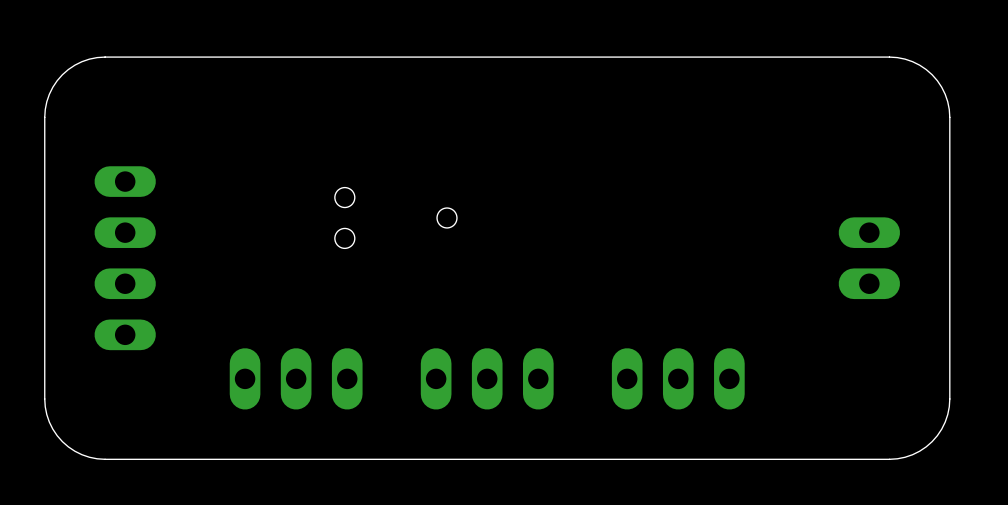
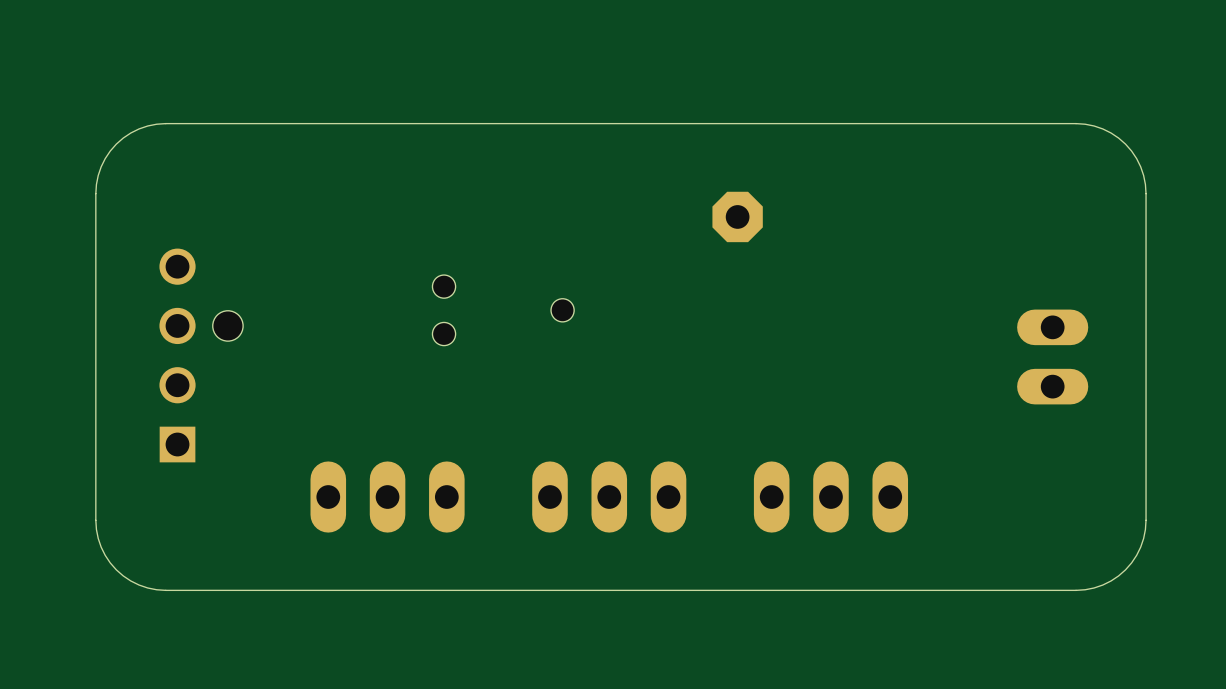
part: none -> (737, 216)
part footprint: [94, 166, 156, 351] -> [159, 248, 244, 463]

